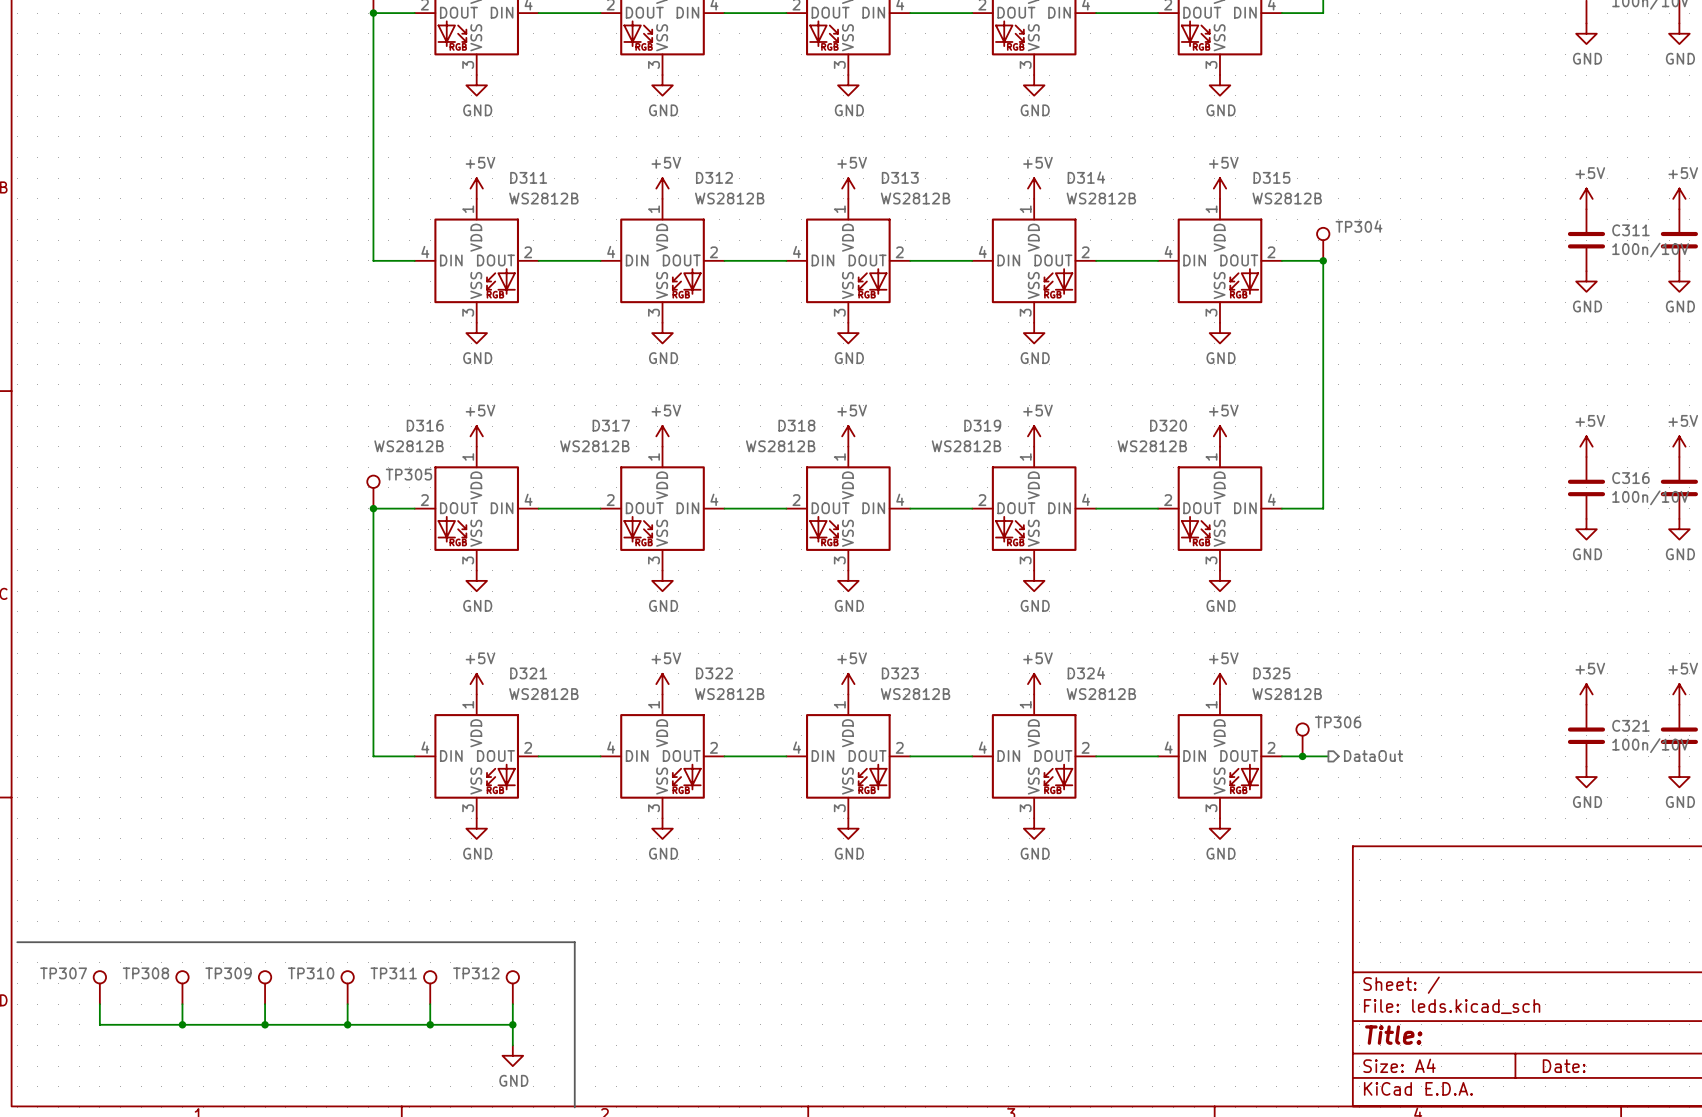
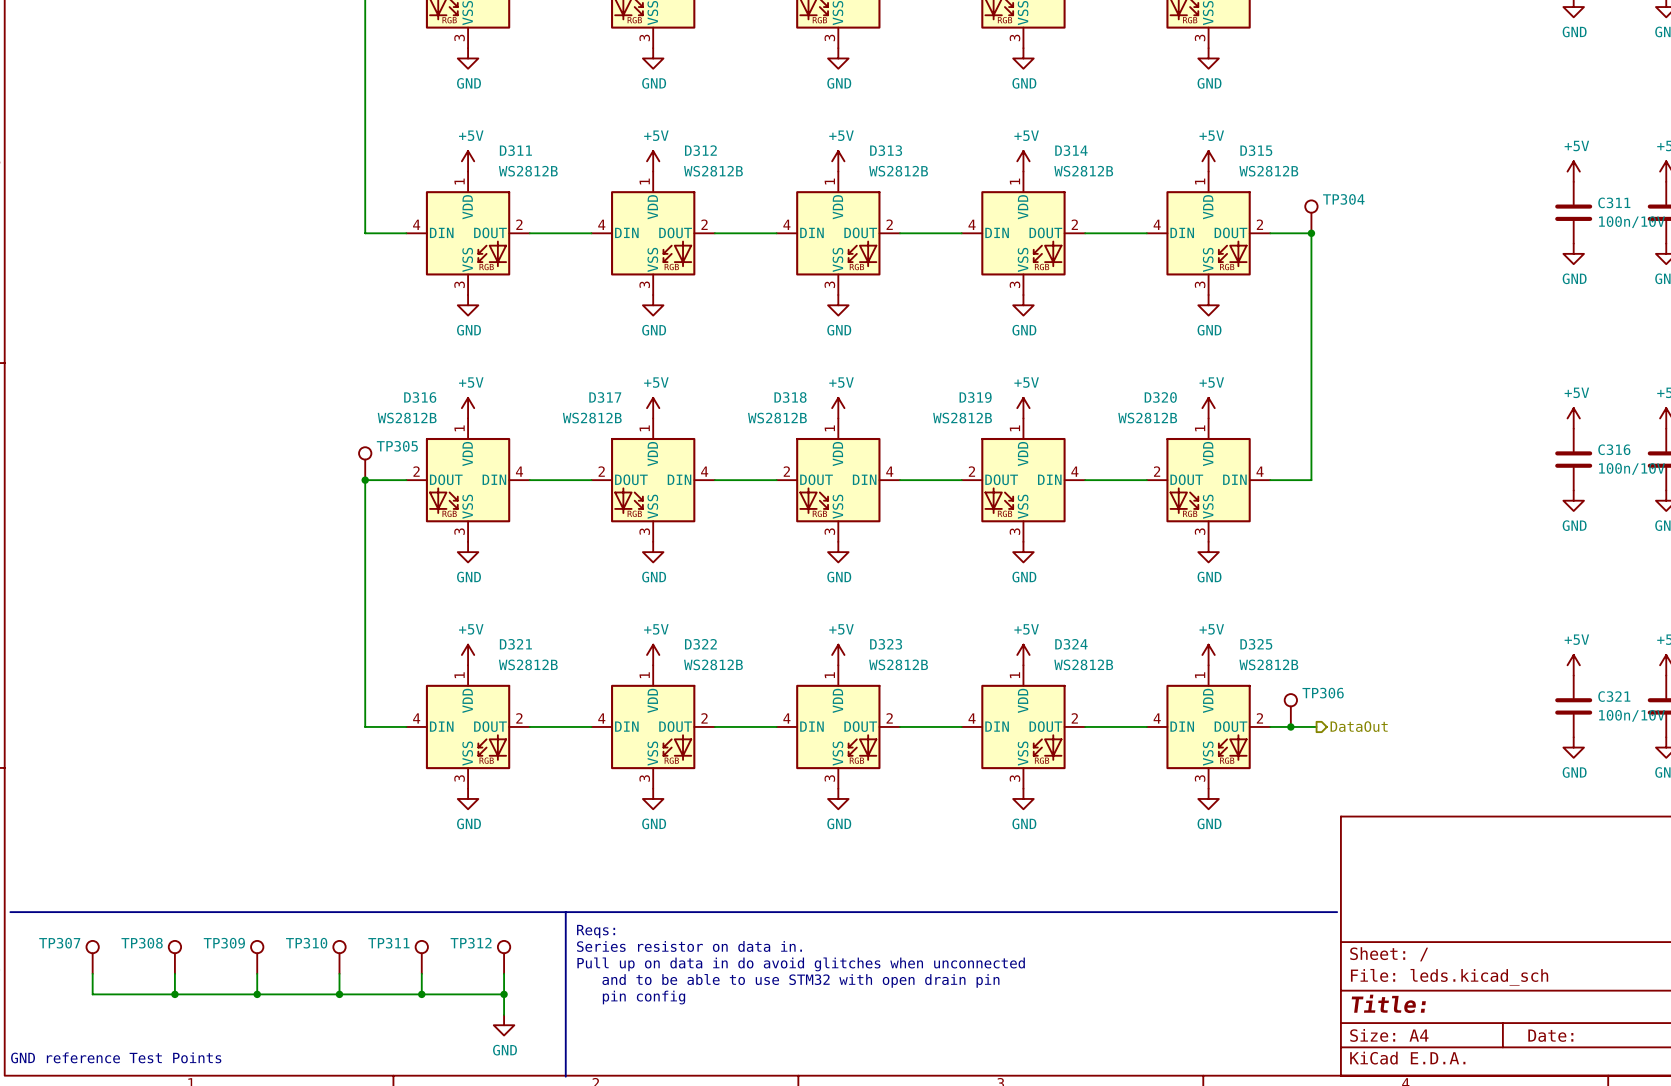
line: none -> (565, 912) (1337, 912)
text: none -> Reqs: (596, 931)
text: none -> Series resistor on data in. (689, 946)
text: none -> Pull up on data in do avoid glitches when unconnected (801, 964)
text: none -> and to be able to use STM32 with open drain pin (800, 980)
text: none -> pin config (643, 997)
text: none -> GND reference Test Points (116, 1057)

